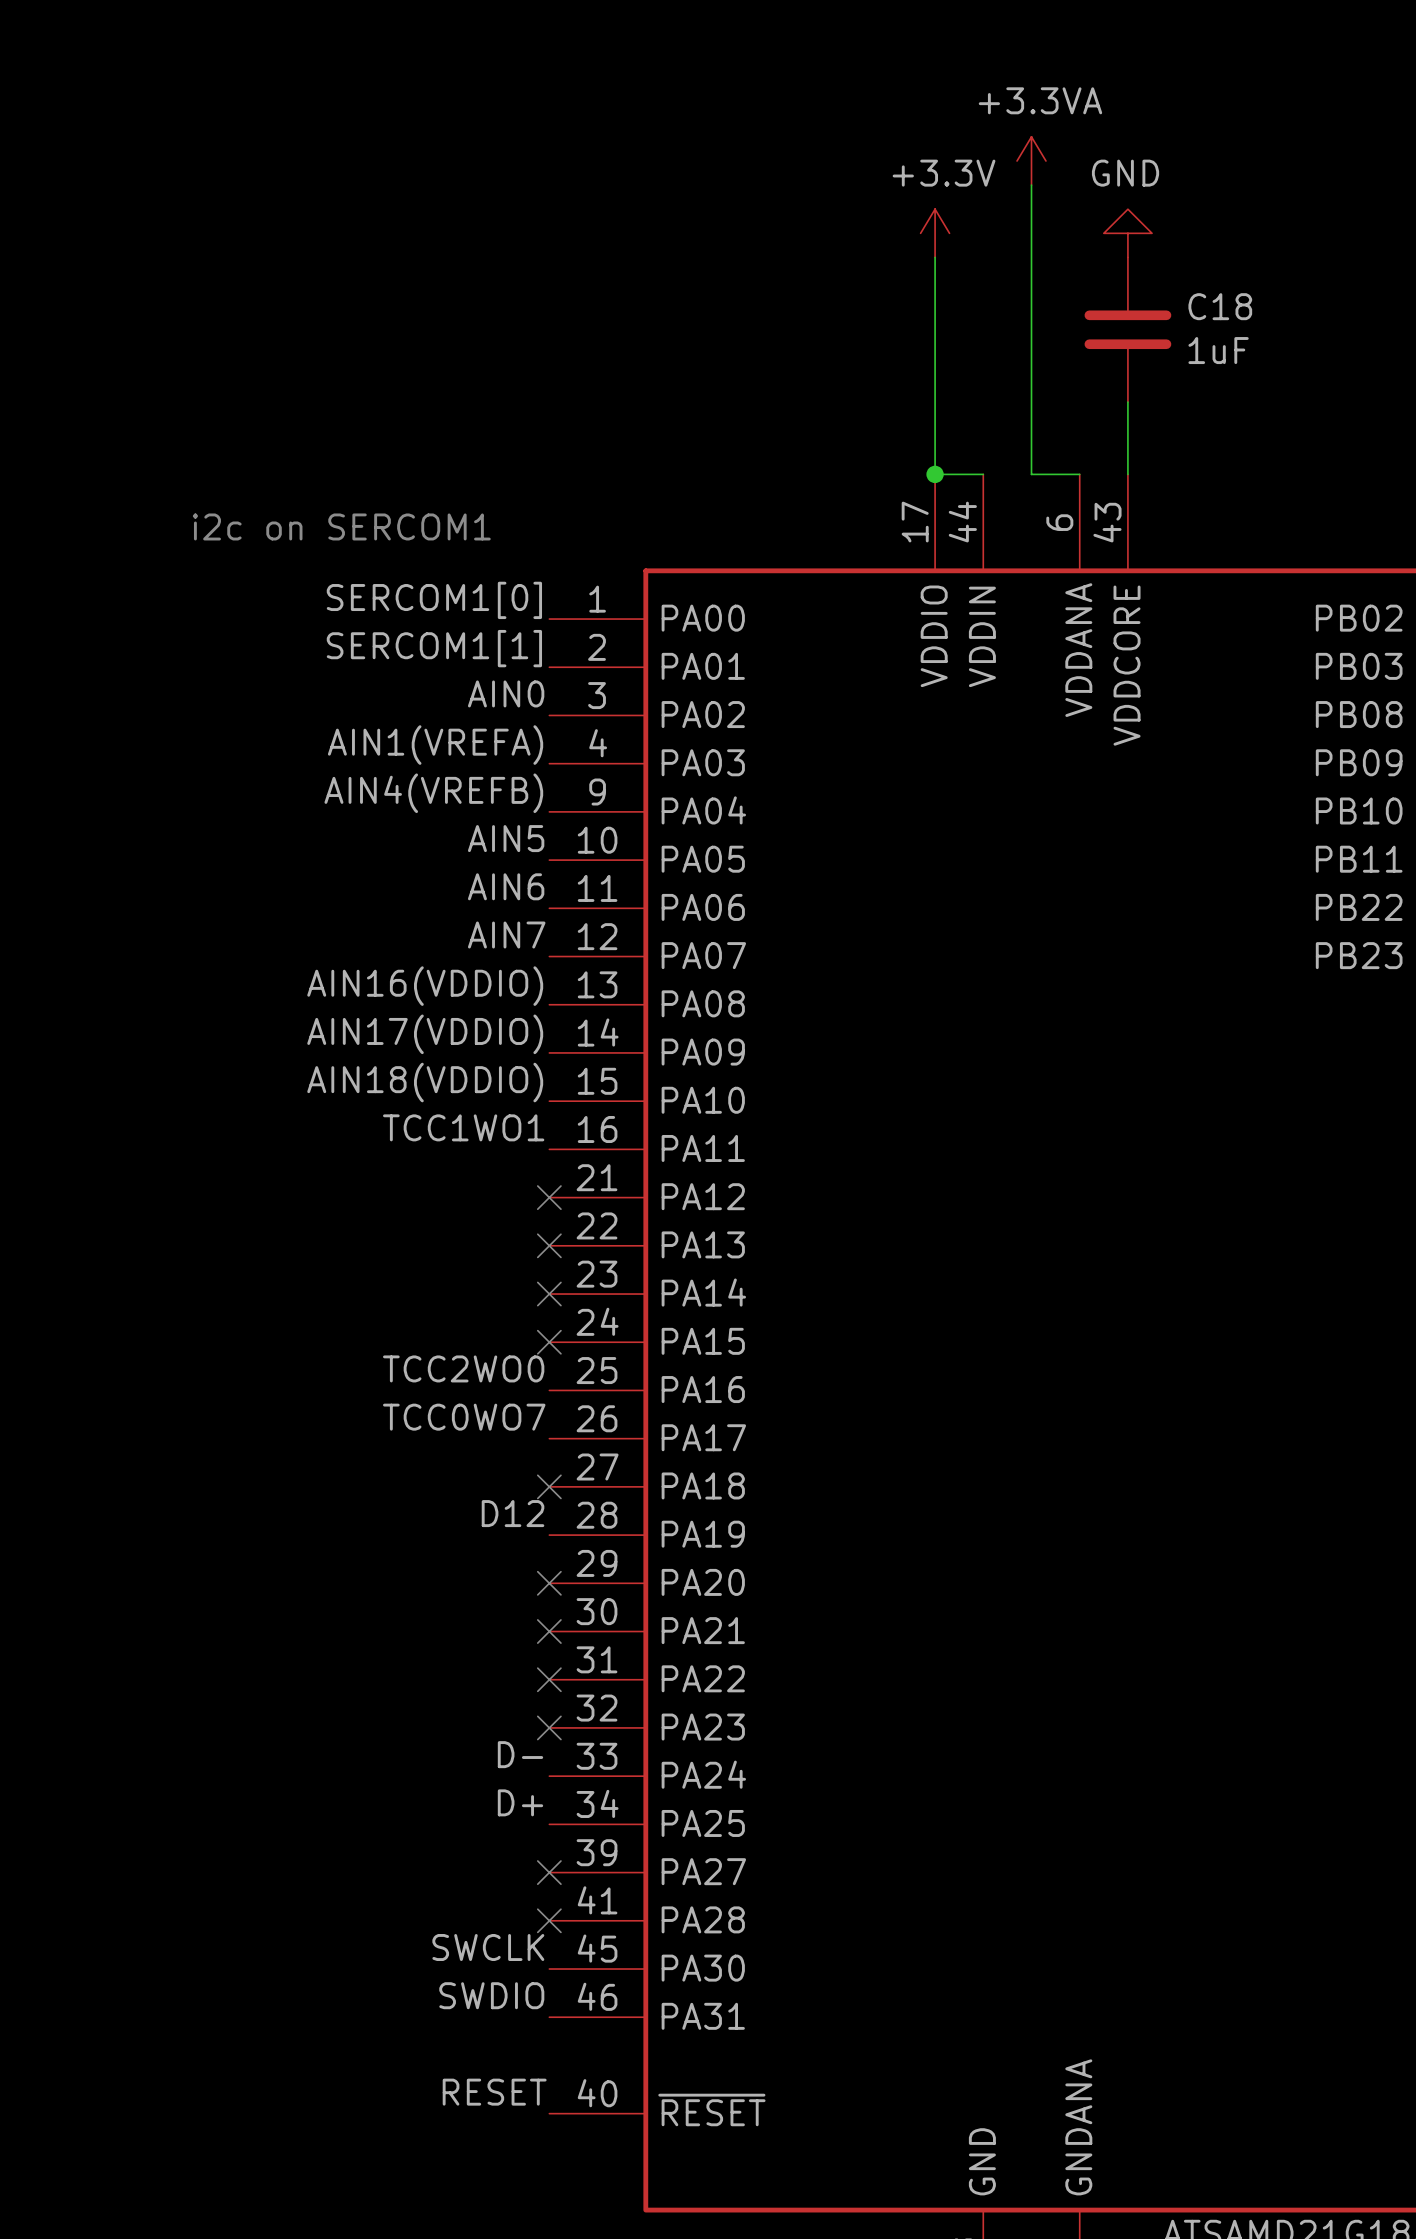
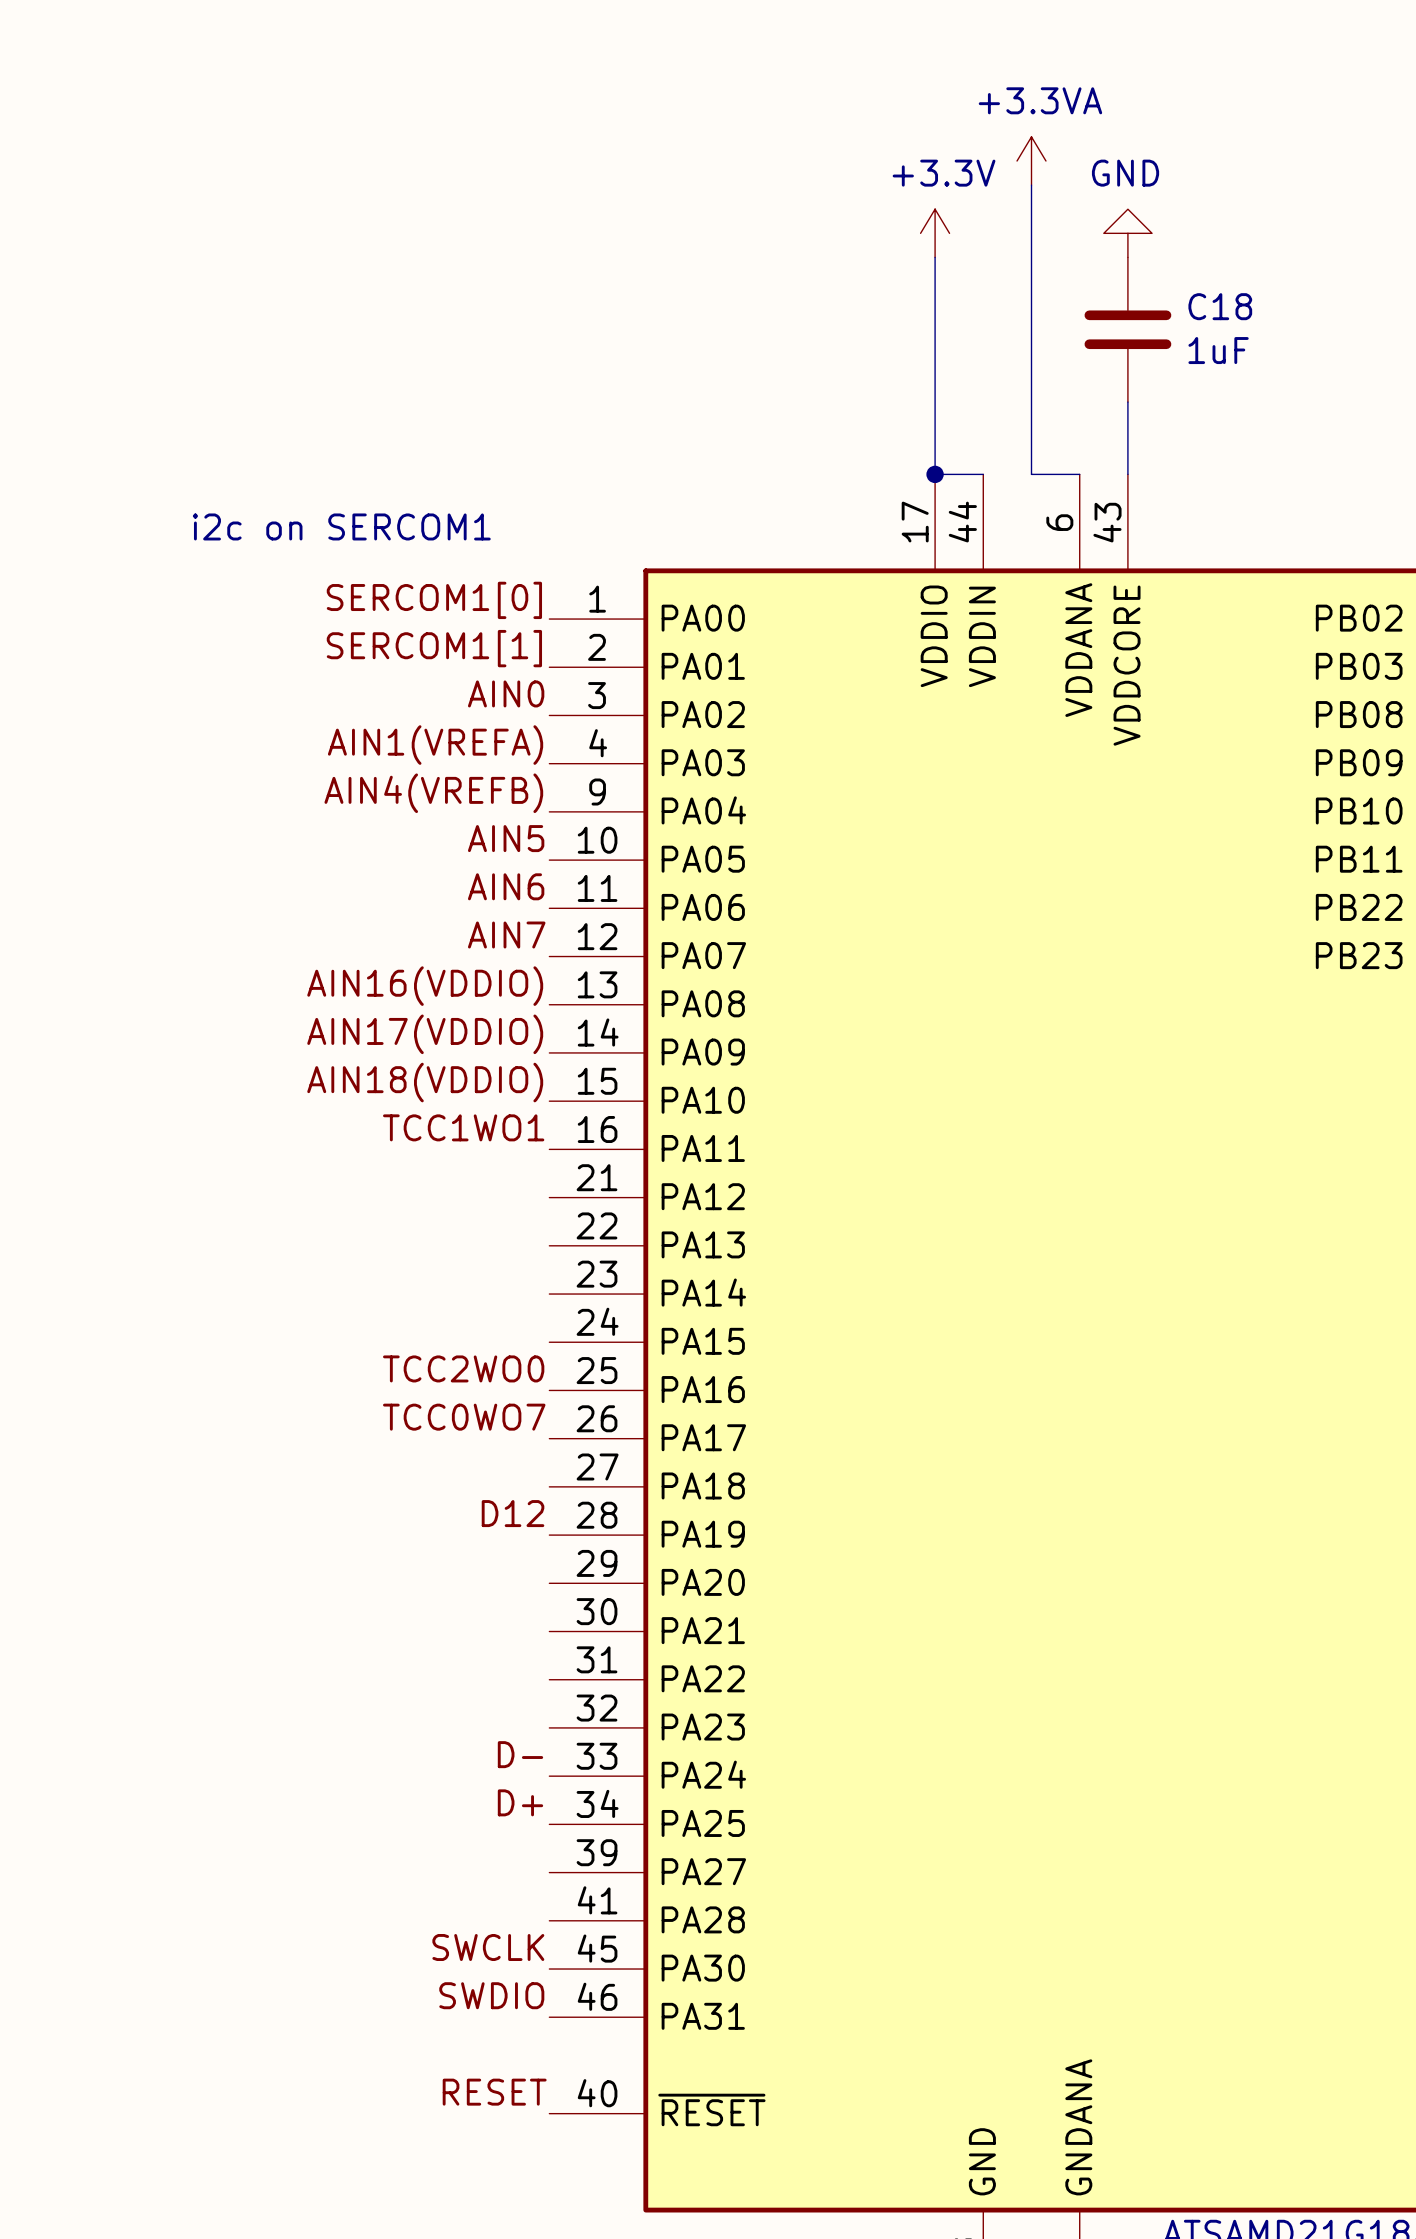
no-connect mark: (549, 1197) -> none
no-connect mark: (549, 1245) -> none
no-connect mark: (549, 1294) -> none
no-connect mark: (549, 1342) -> none
no-connect mark: (549, 1486) -> none
no-connect mark: (549, 1583) -> none
no-connect mark: (549, 1631) -> none
no-connect mark: (549, 1679) -> none
no-connect mark: (549, 1727) -> none
no-connect mark: (549, 1872) -> none
no-connect mark: (549, 1920) -> none

